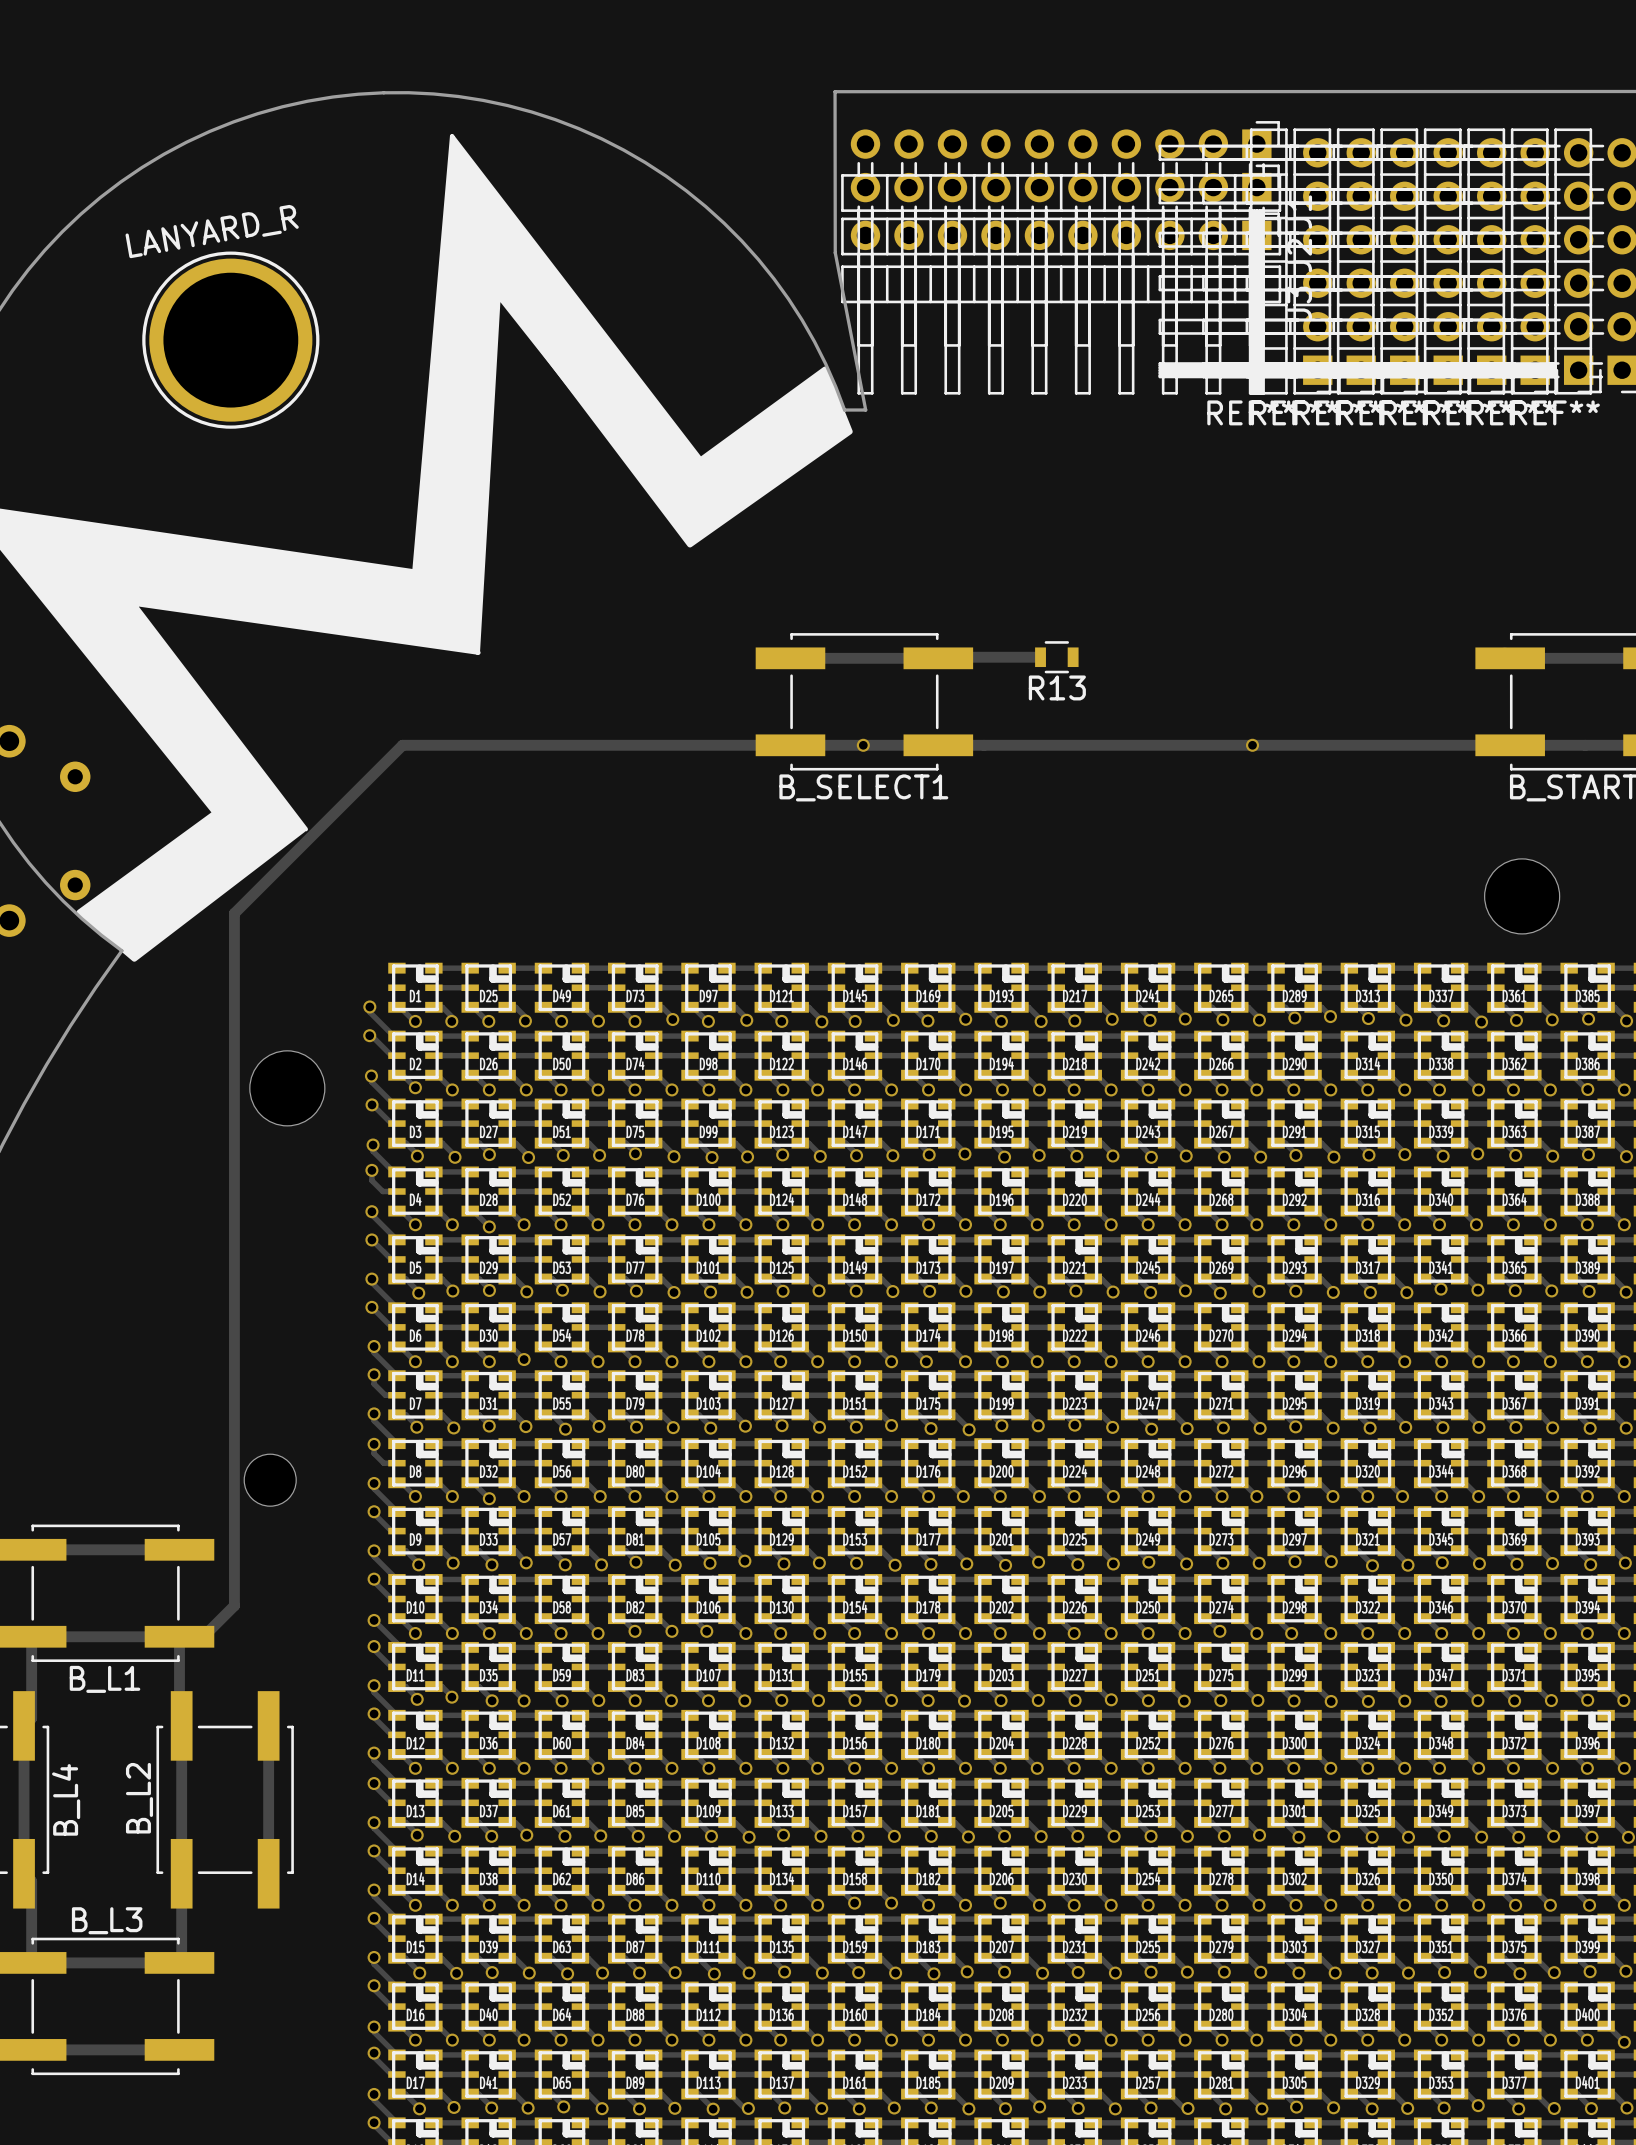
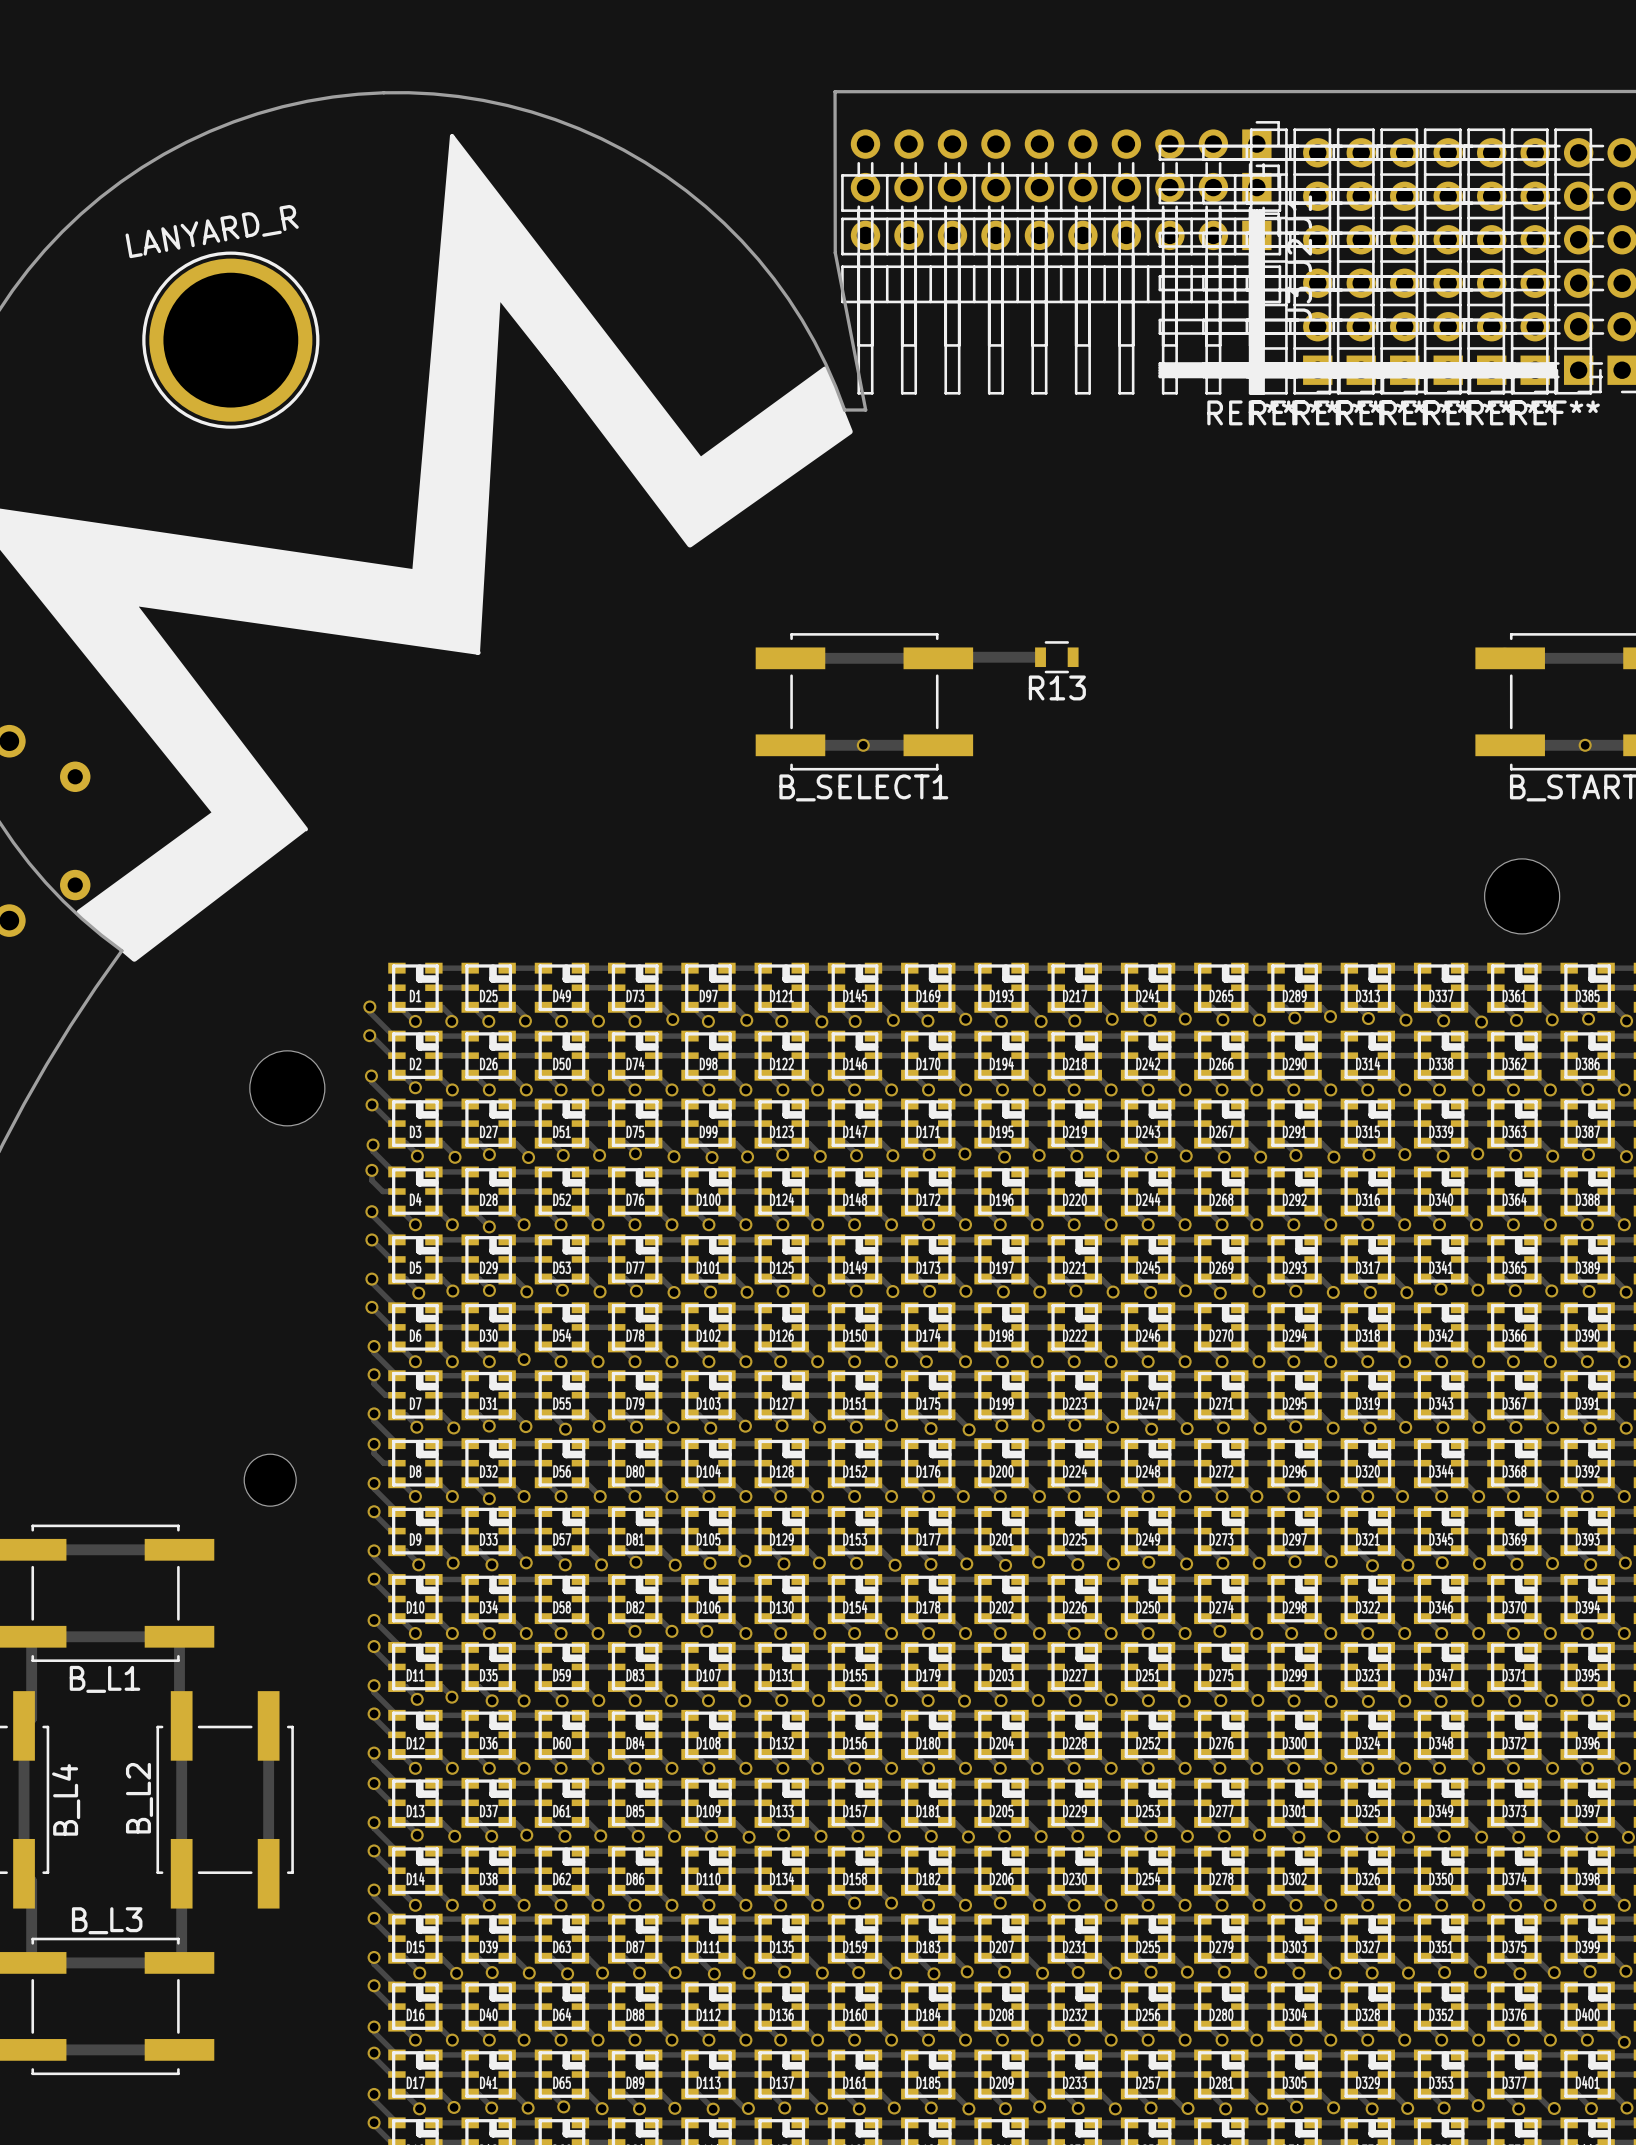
track: (790, 745) (402, 745) (234, 913) (234, 1605) (203, 1636) (179, 1636) -> none
track: (938, 745) (1510, 745) -> none
via: (1252, 745) -> none
via: none -> (1585, 745)

